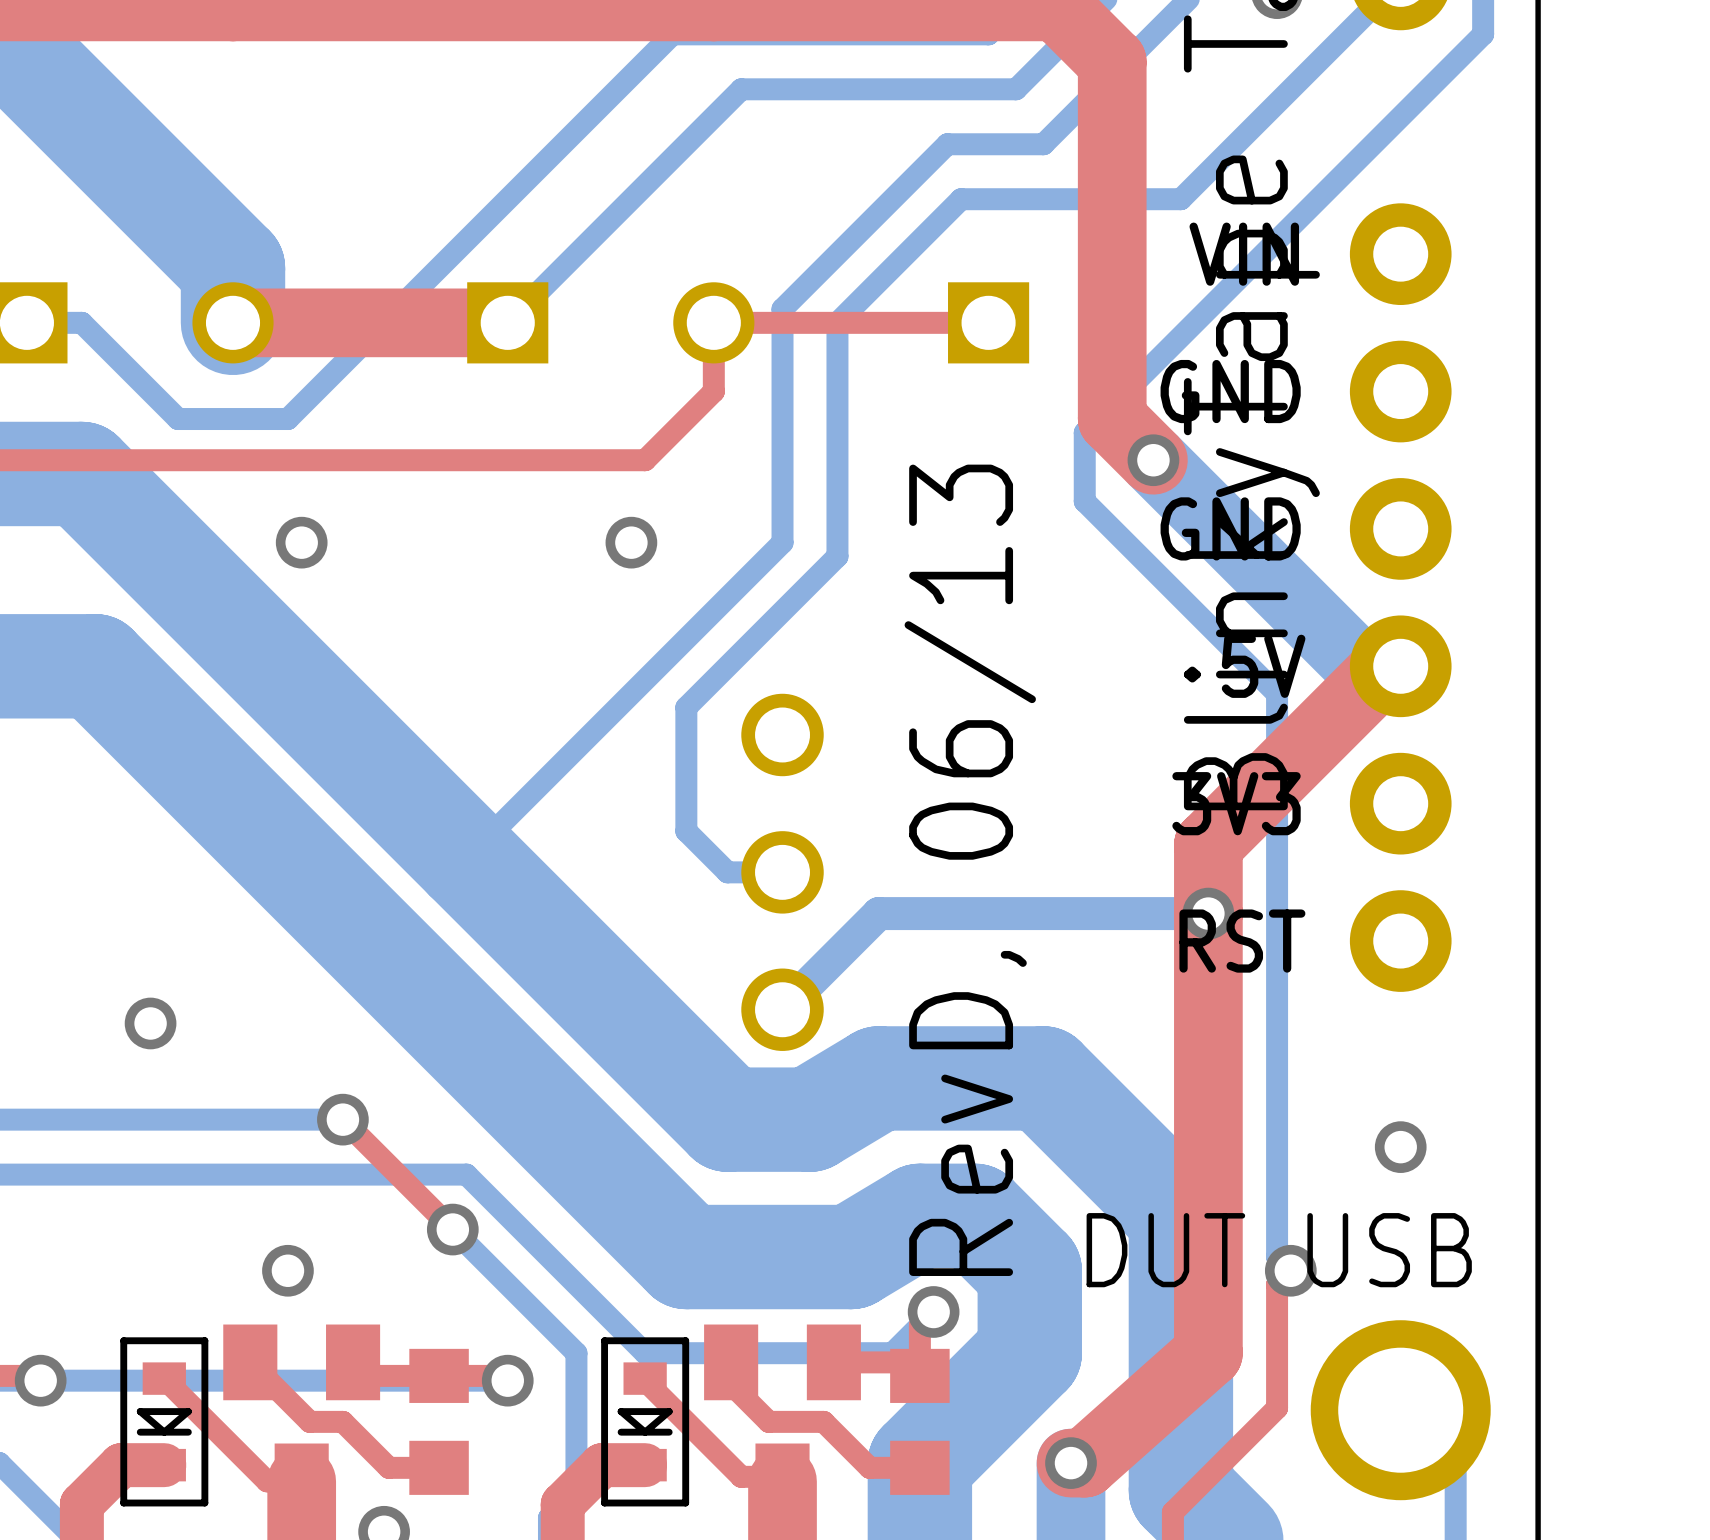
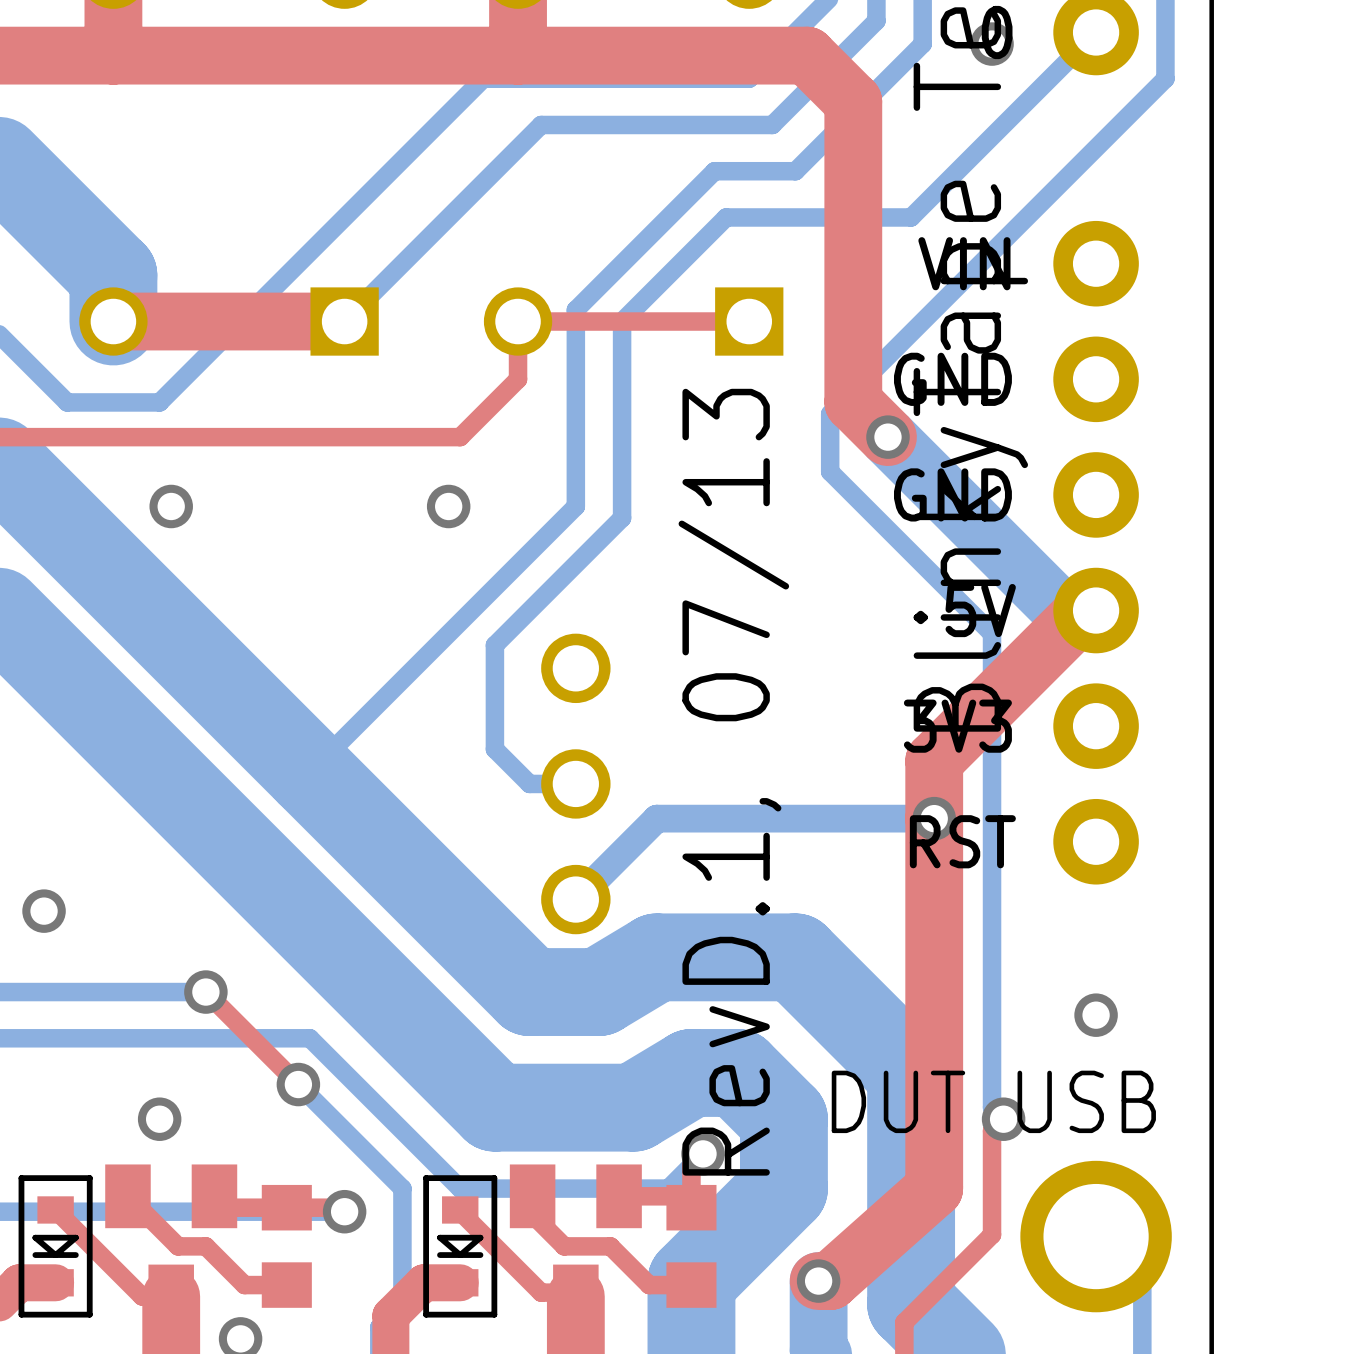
text: RevD, 06/13 (970, 870) -> RevD.1, 07/13 (733, 782)

